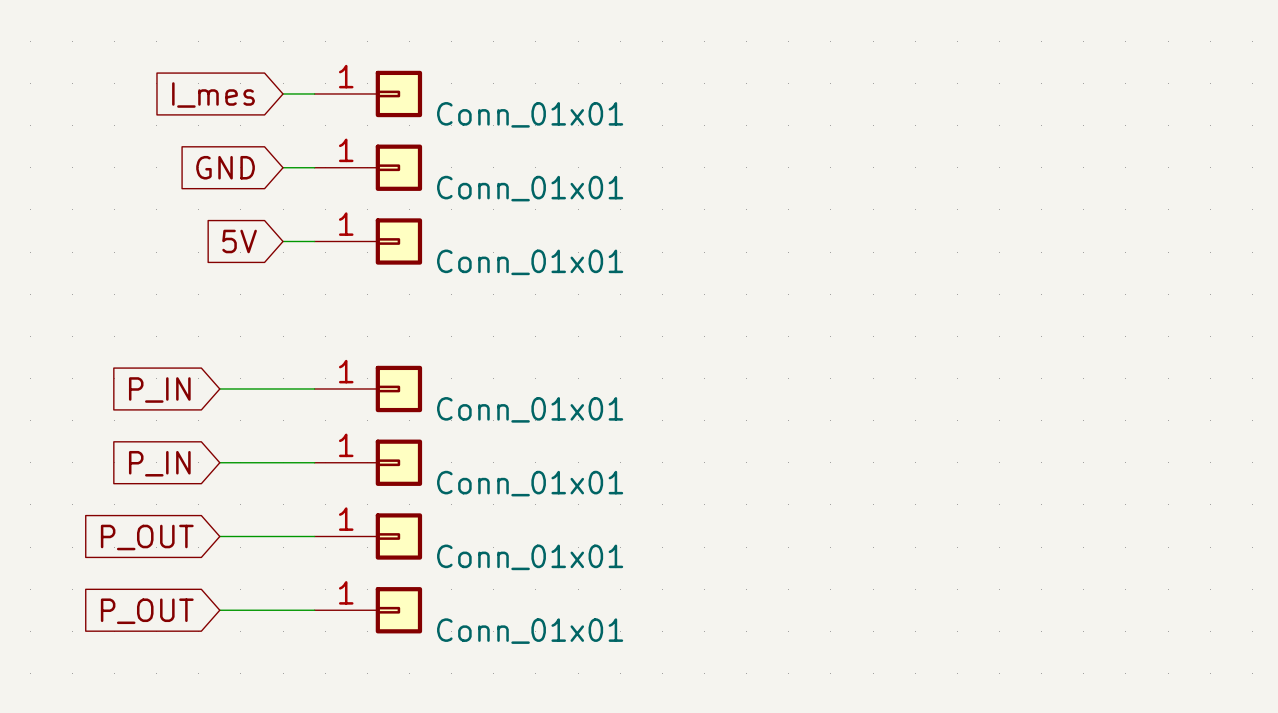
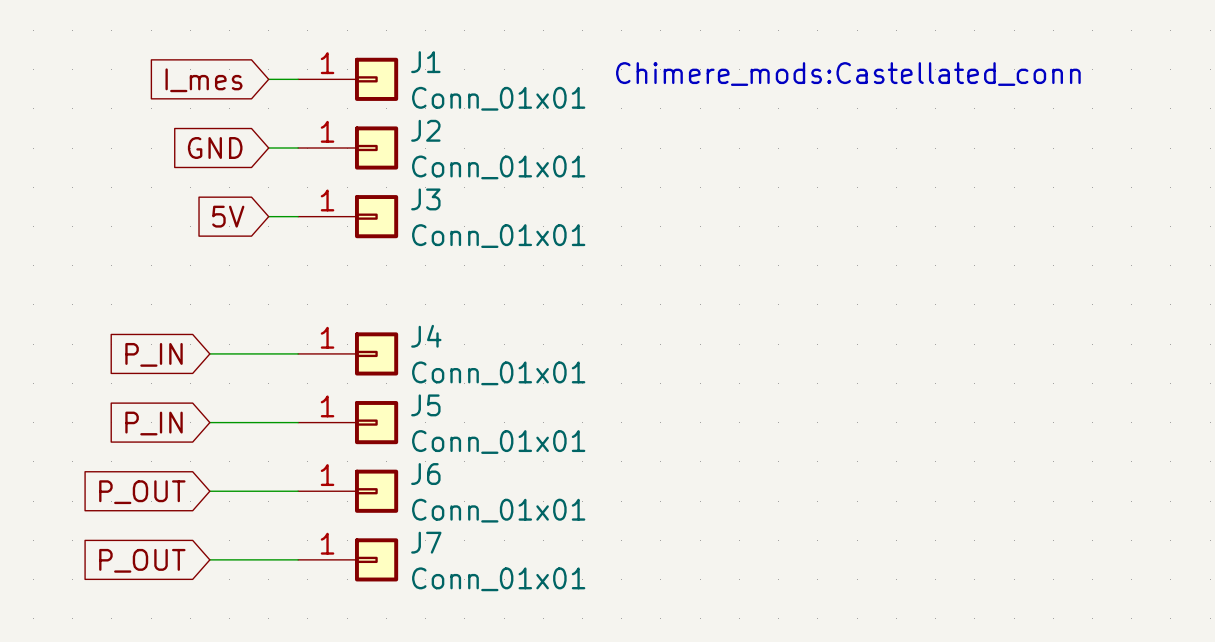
J1 name: none -> J1 (425, 62)
text: none -> Chimere_mods:Castellated_conn (848, 74)
J2 name: none -> J2 (425, 130)
J3 name: none -> J3 (425, 199)
J4 name: none -> J4 (426, 336)
J5 name: none -> J5 (425, 405)
J6 name: none -> J6 (425, 474)
J7 name: none -> J7 (426, 542)

